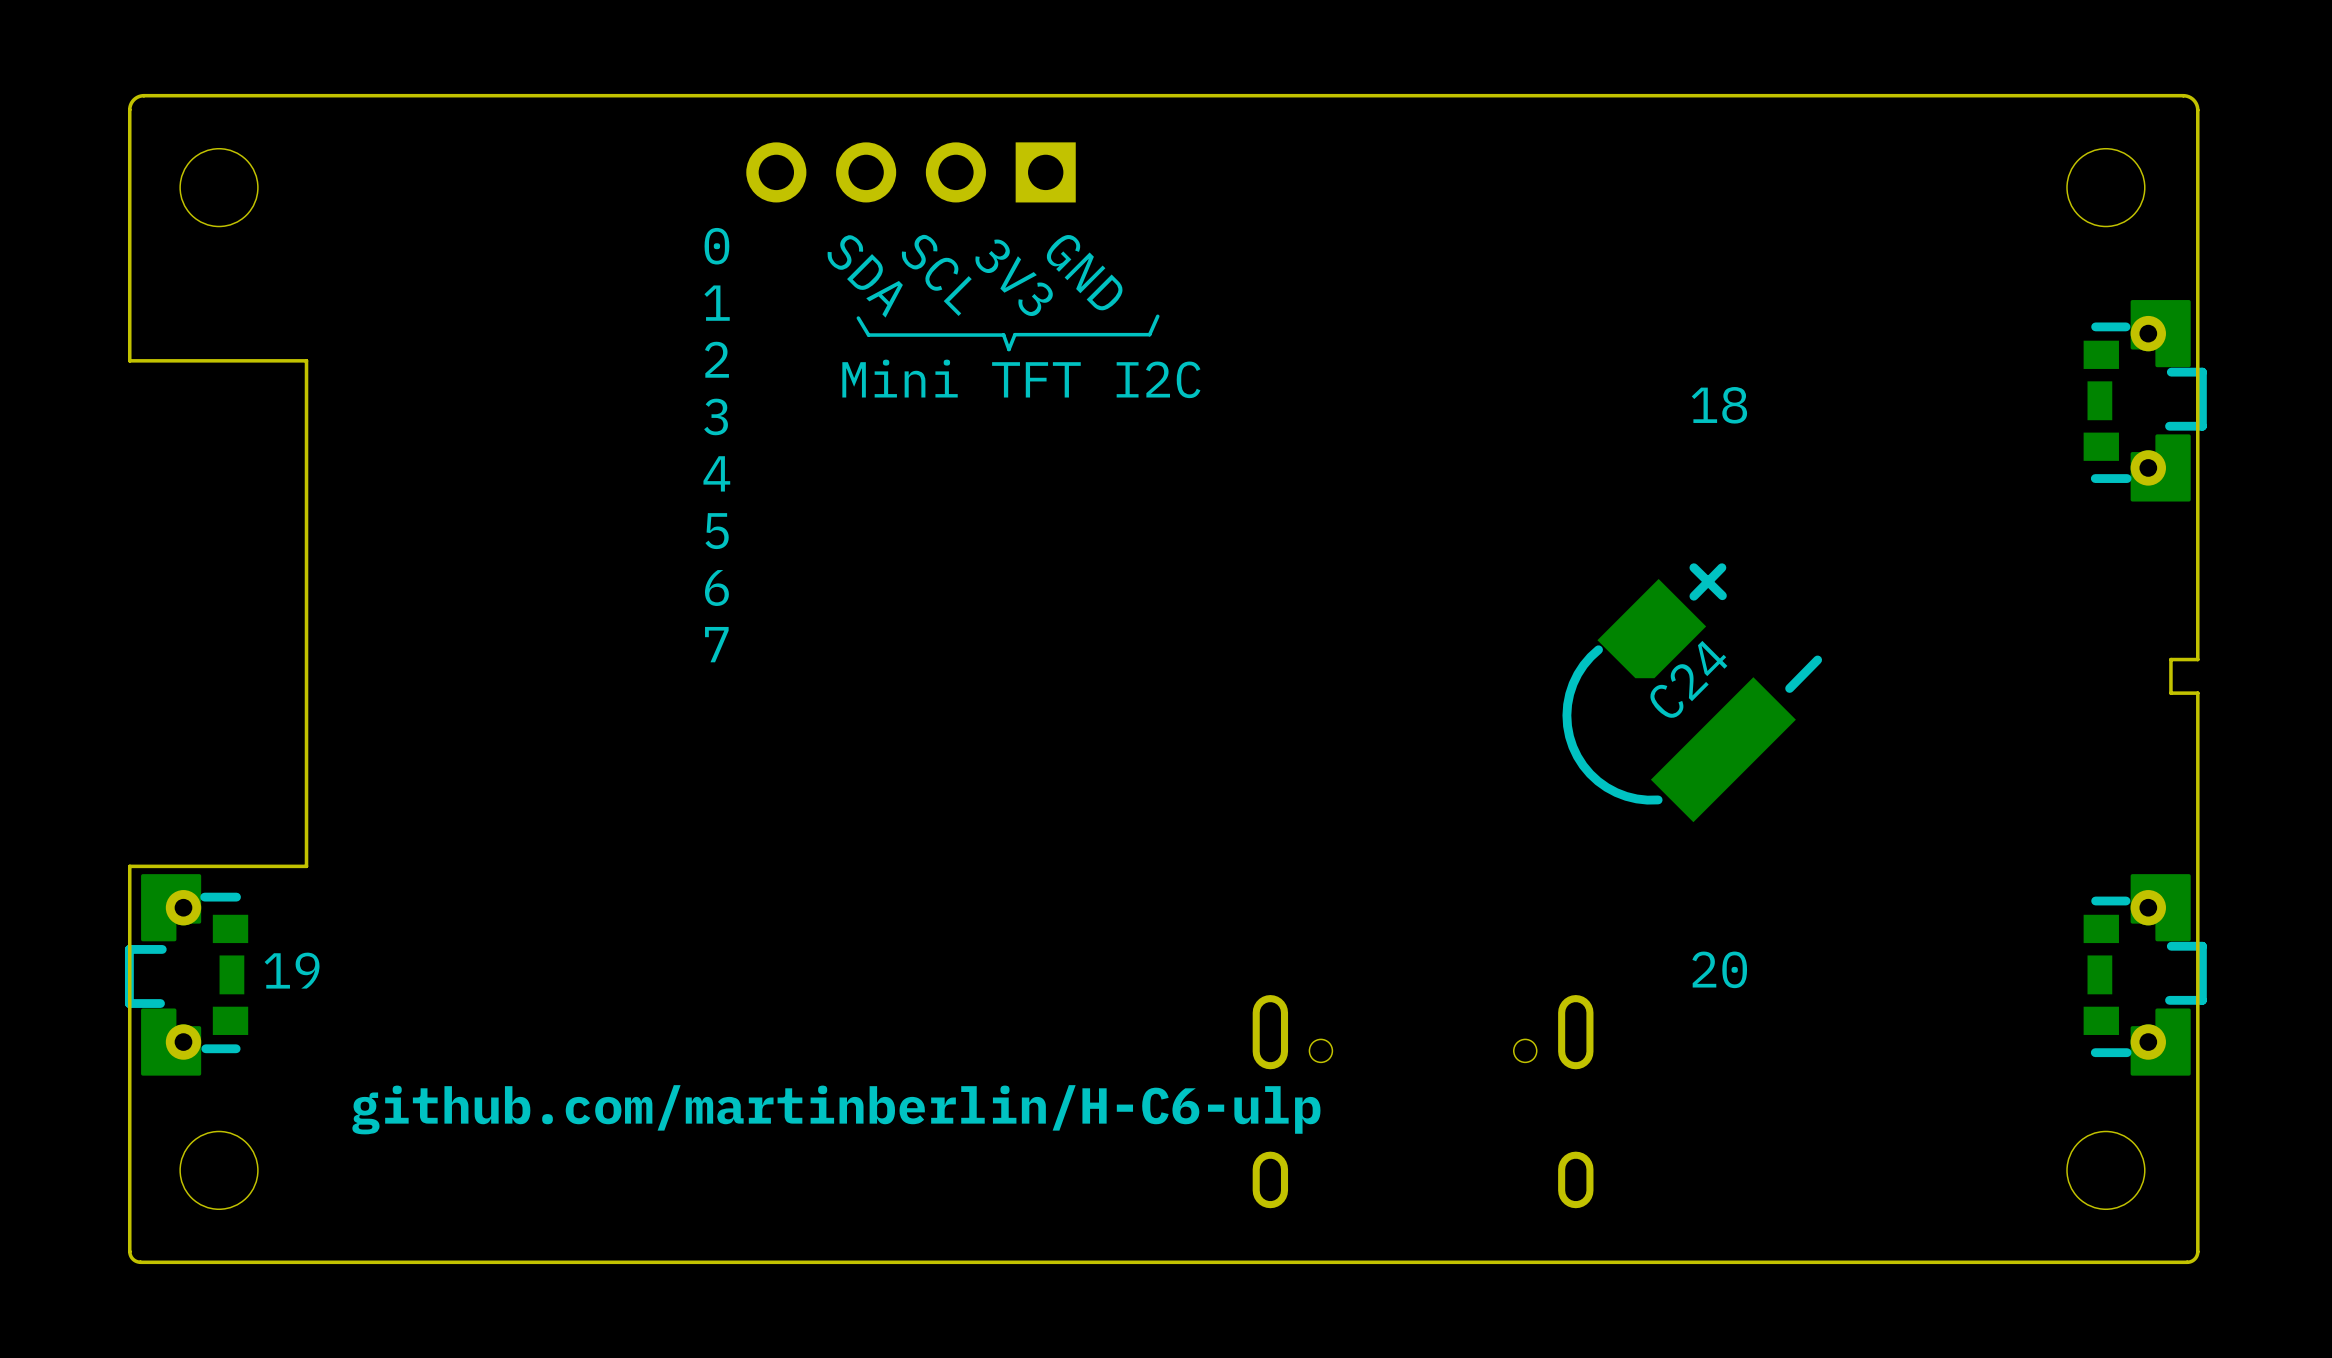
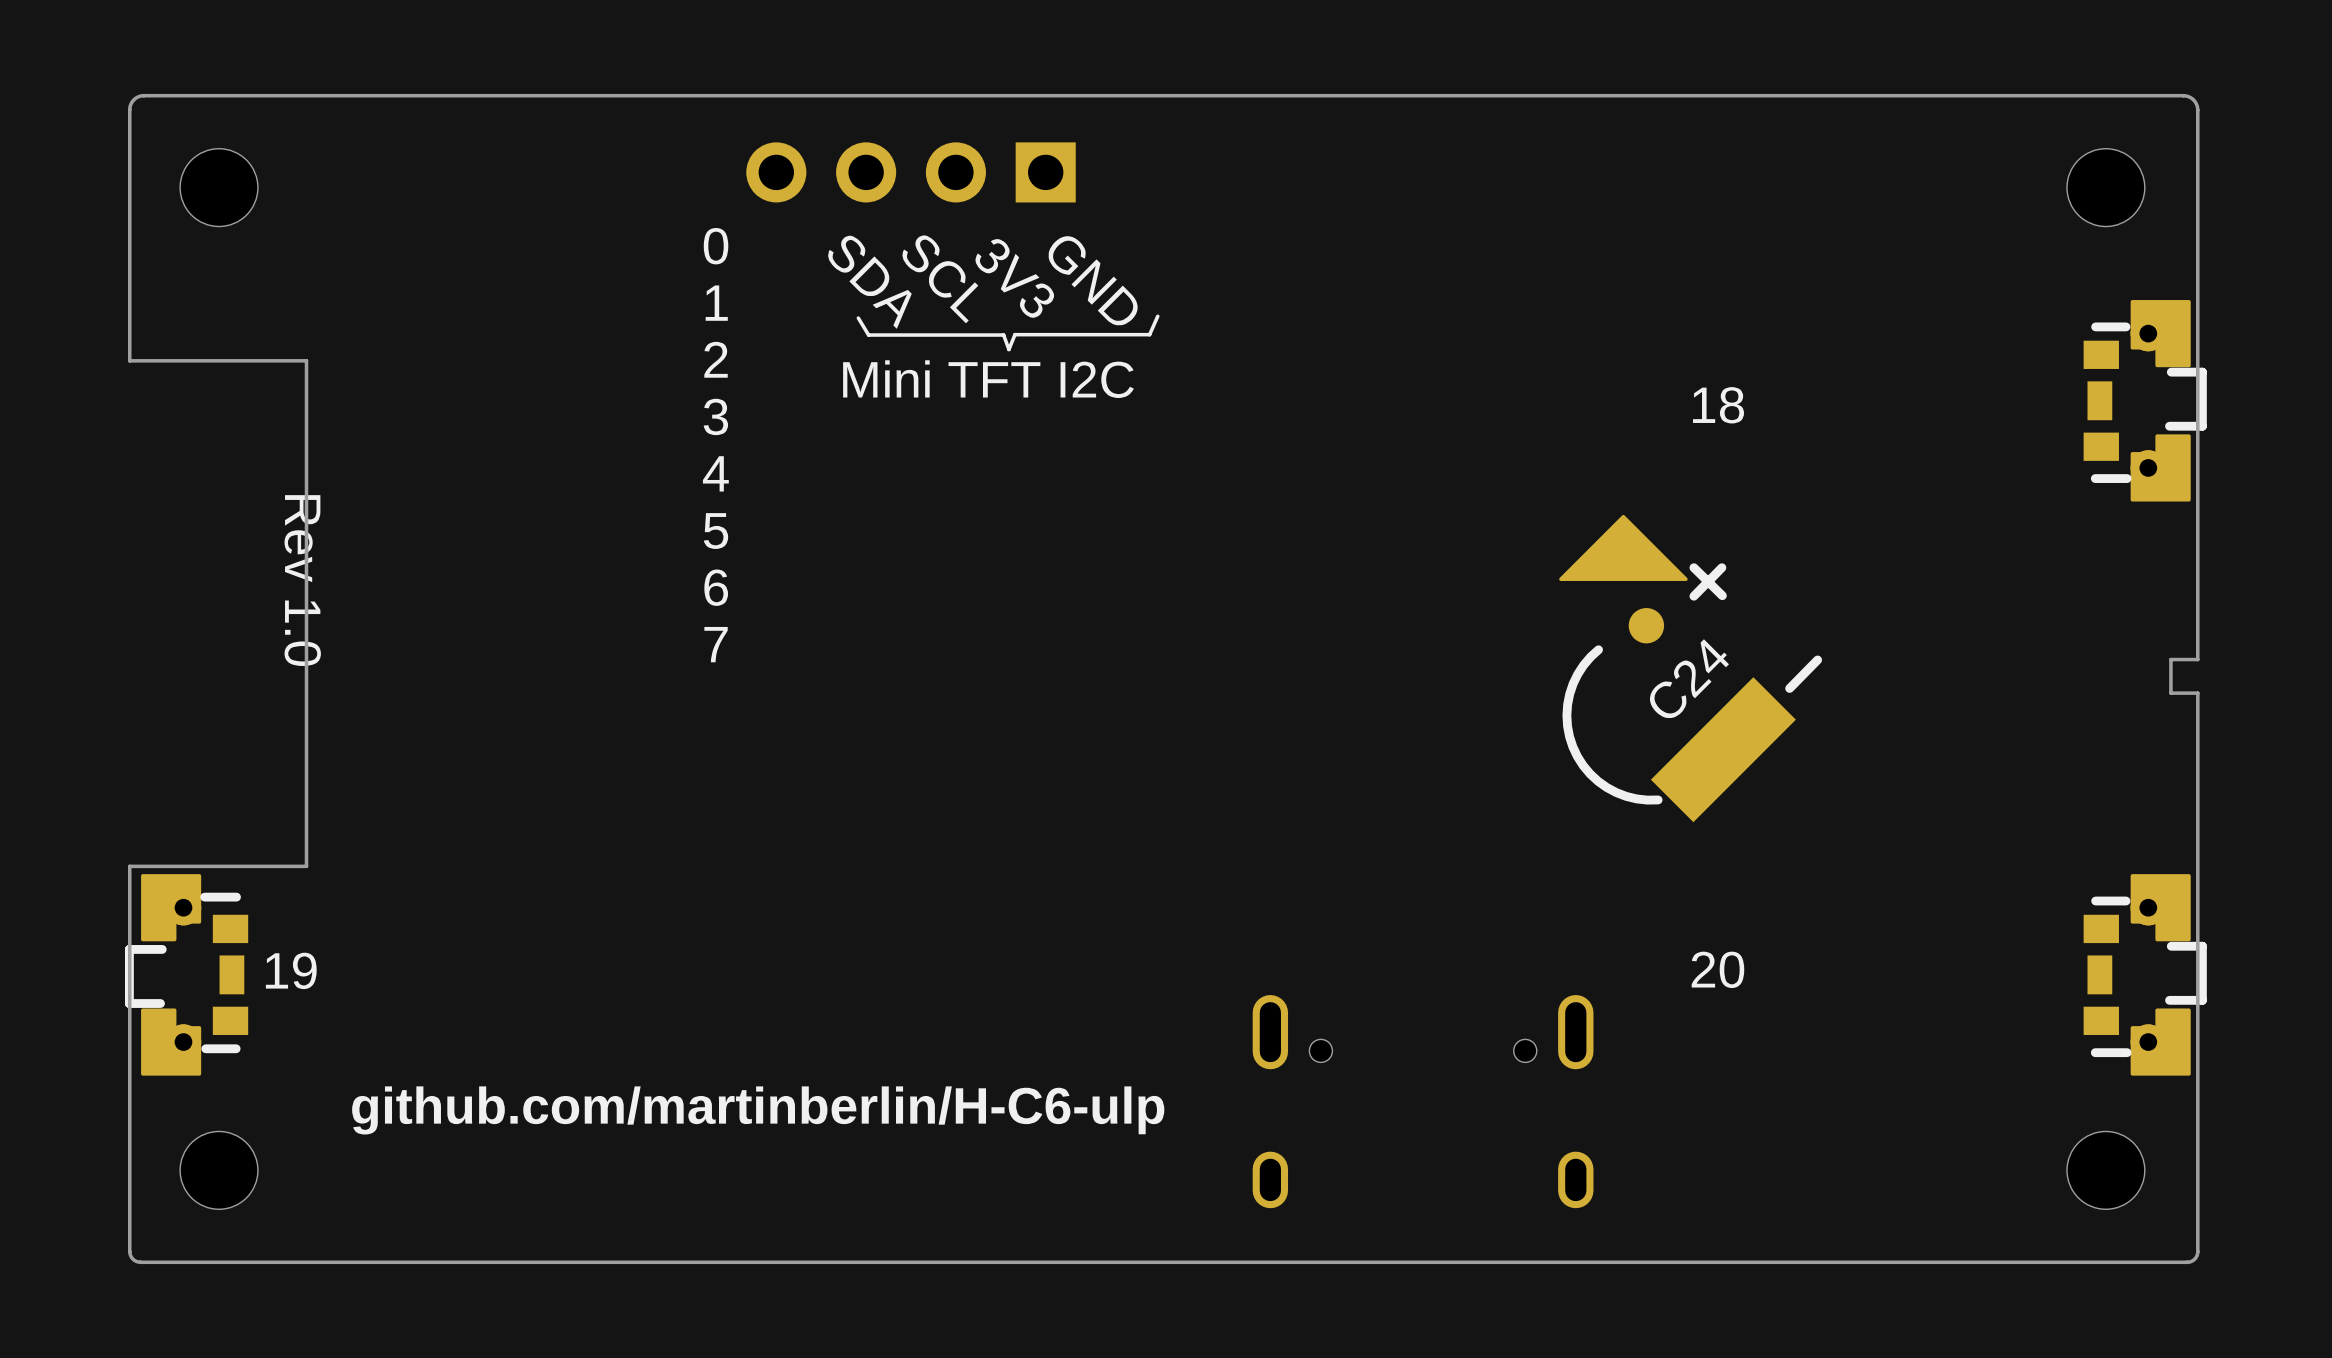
C24 footprint: [1562, 563, 1823, 823] -> [1559, 514, 1823, 823]
text: none -> Rev 1.0 (302, 580)

